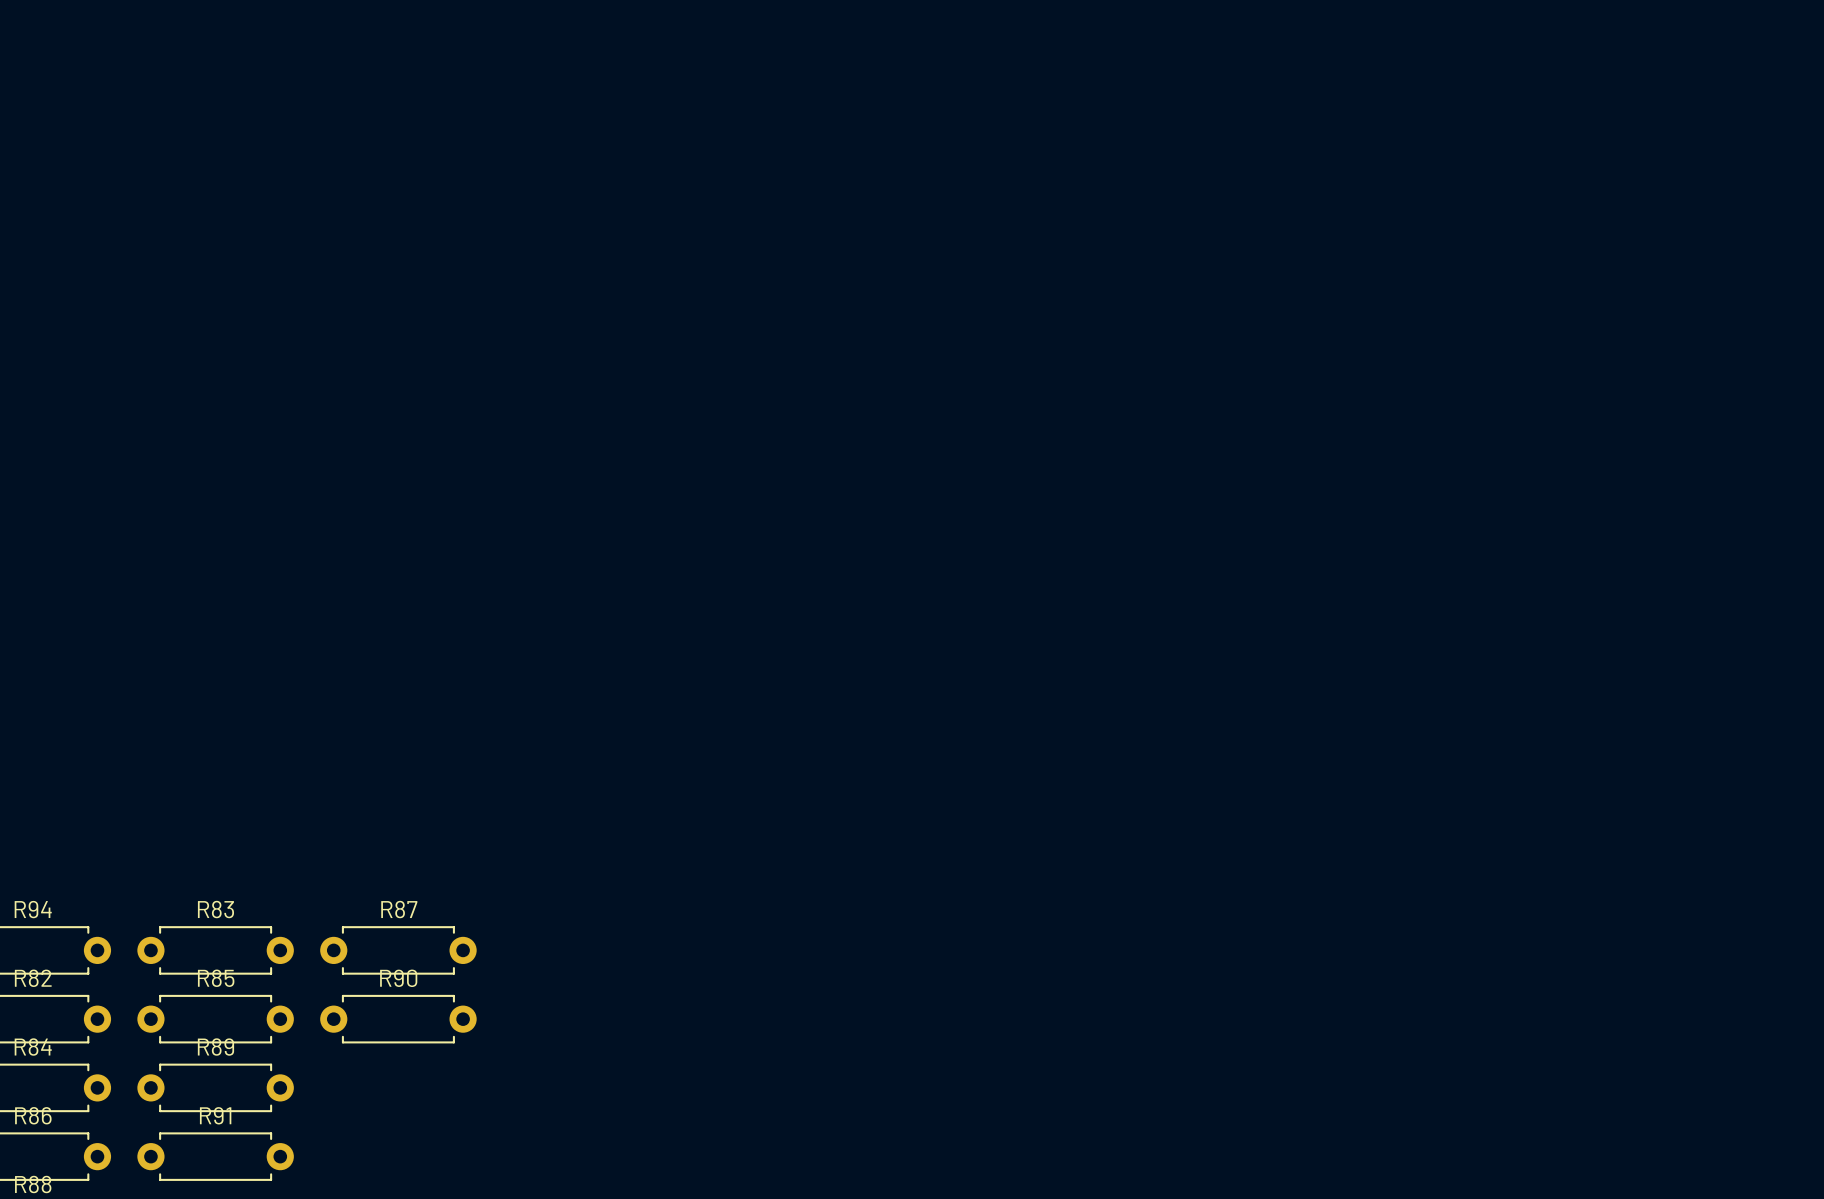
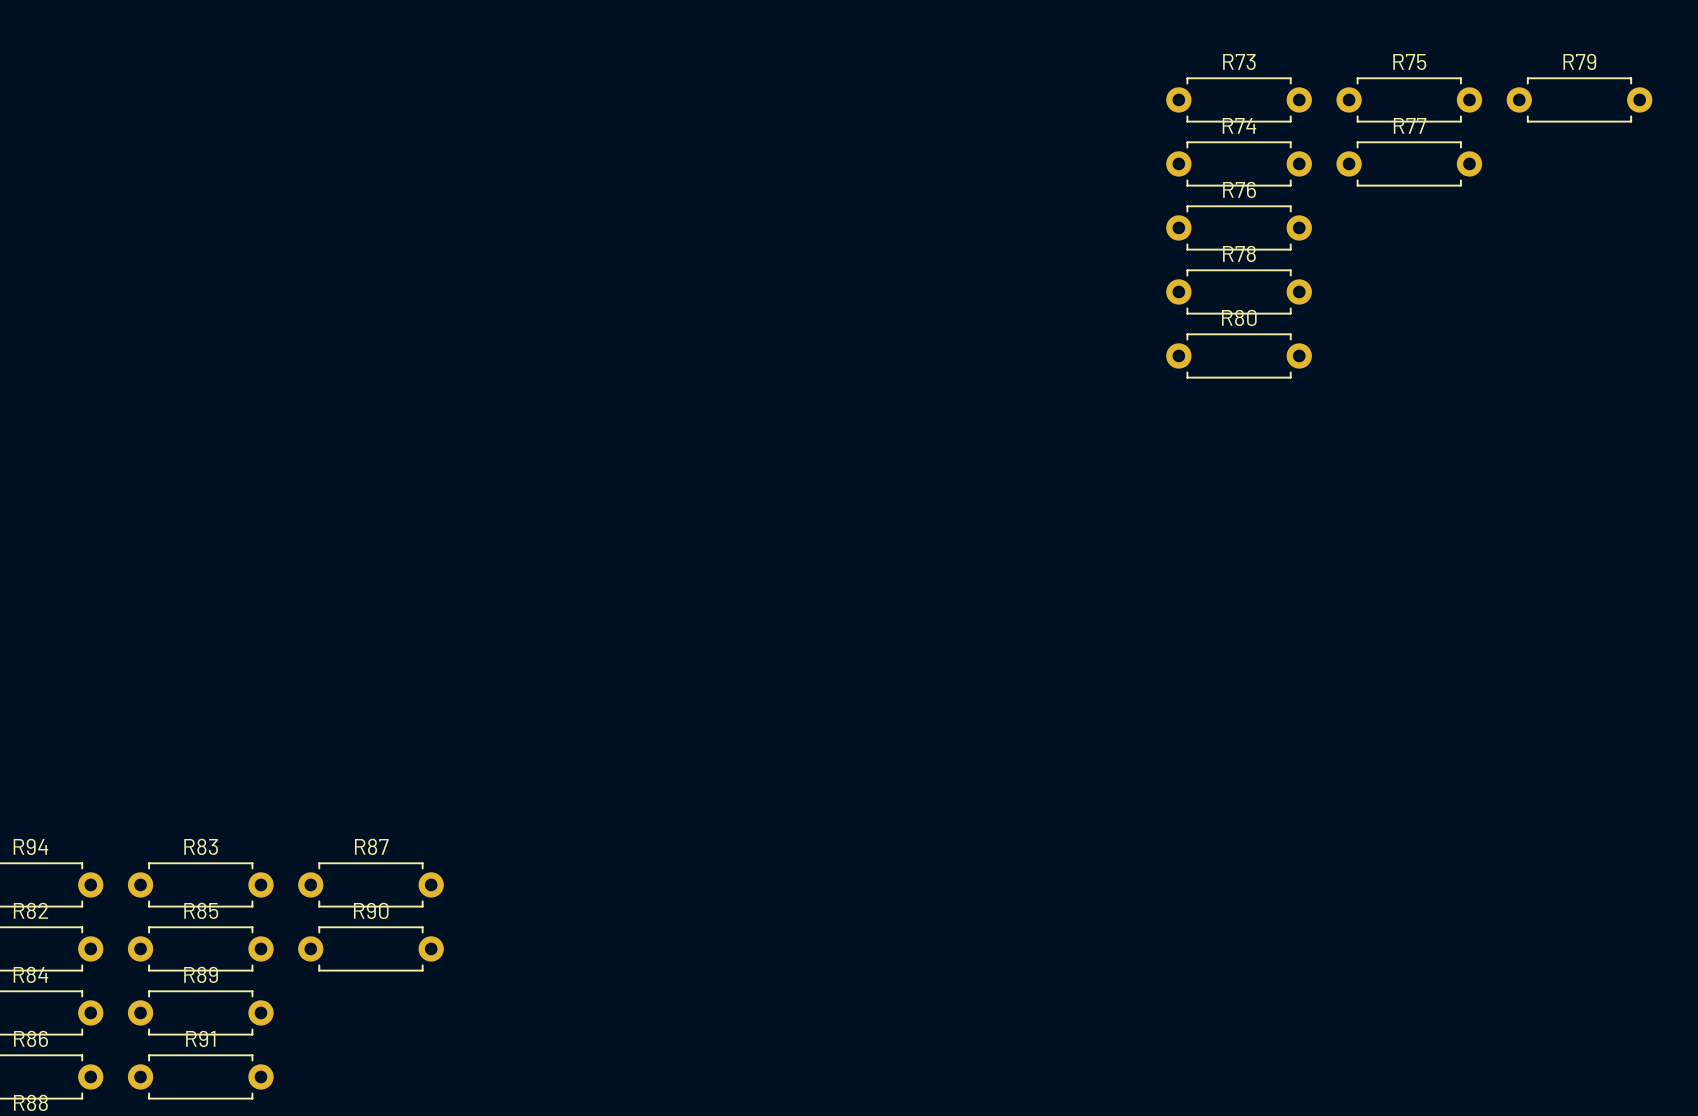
R73: none -> (1239, 99)
R75: none -> (1409, 99)
R79: none -> (1579, 99)
R74: none -> (1239, 163)
R77: none -> (1409, 163)
R76: none -> (1239, 227)
R78: none -> (1239, 291)
R80: none -> (1239, 355)

